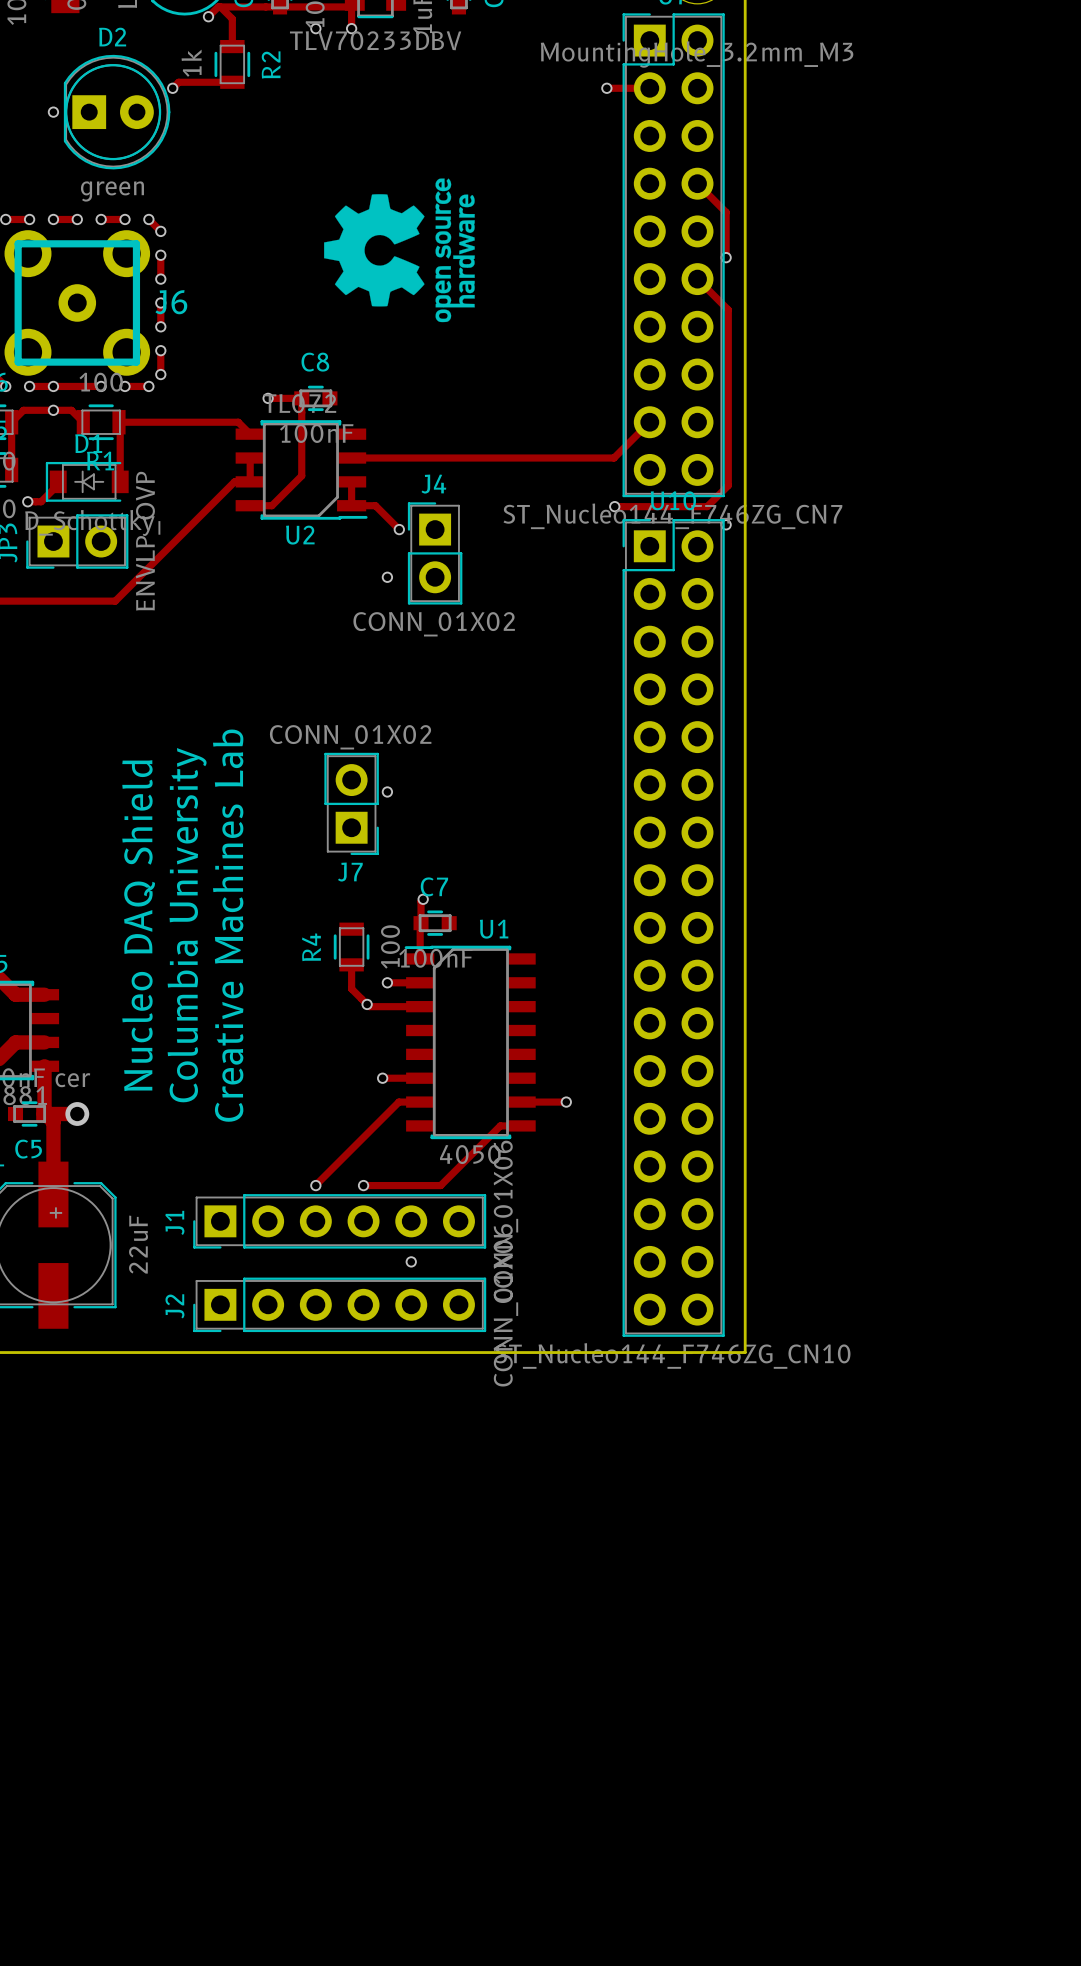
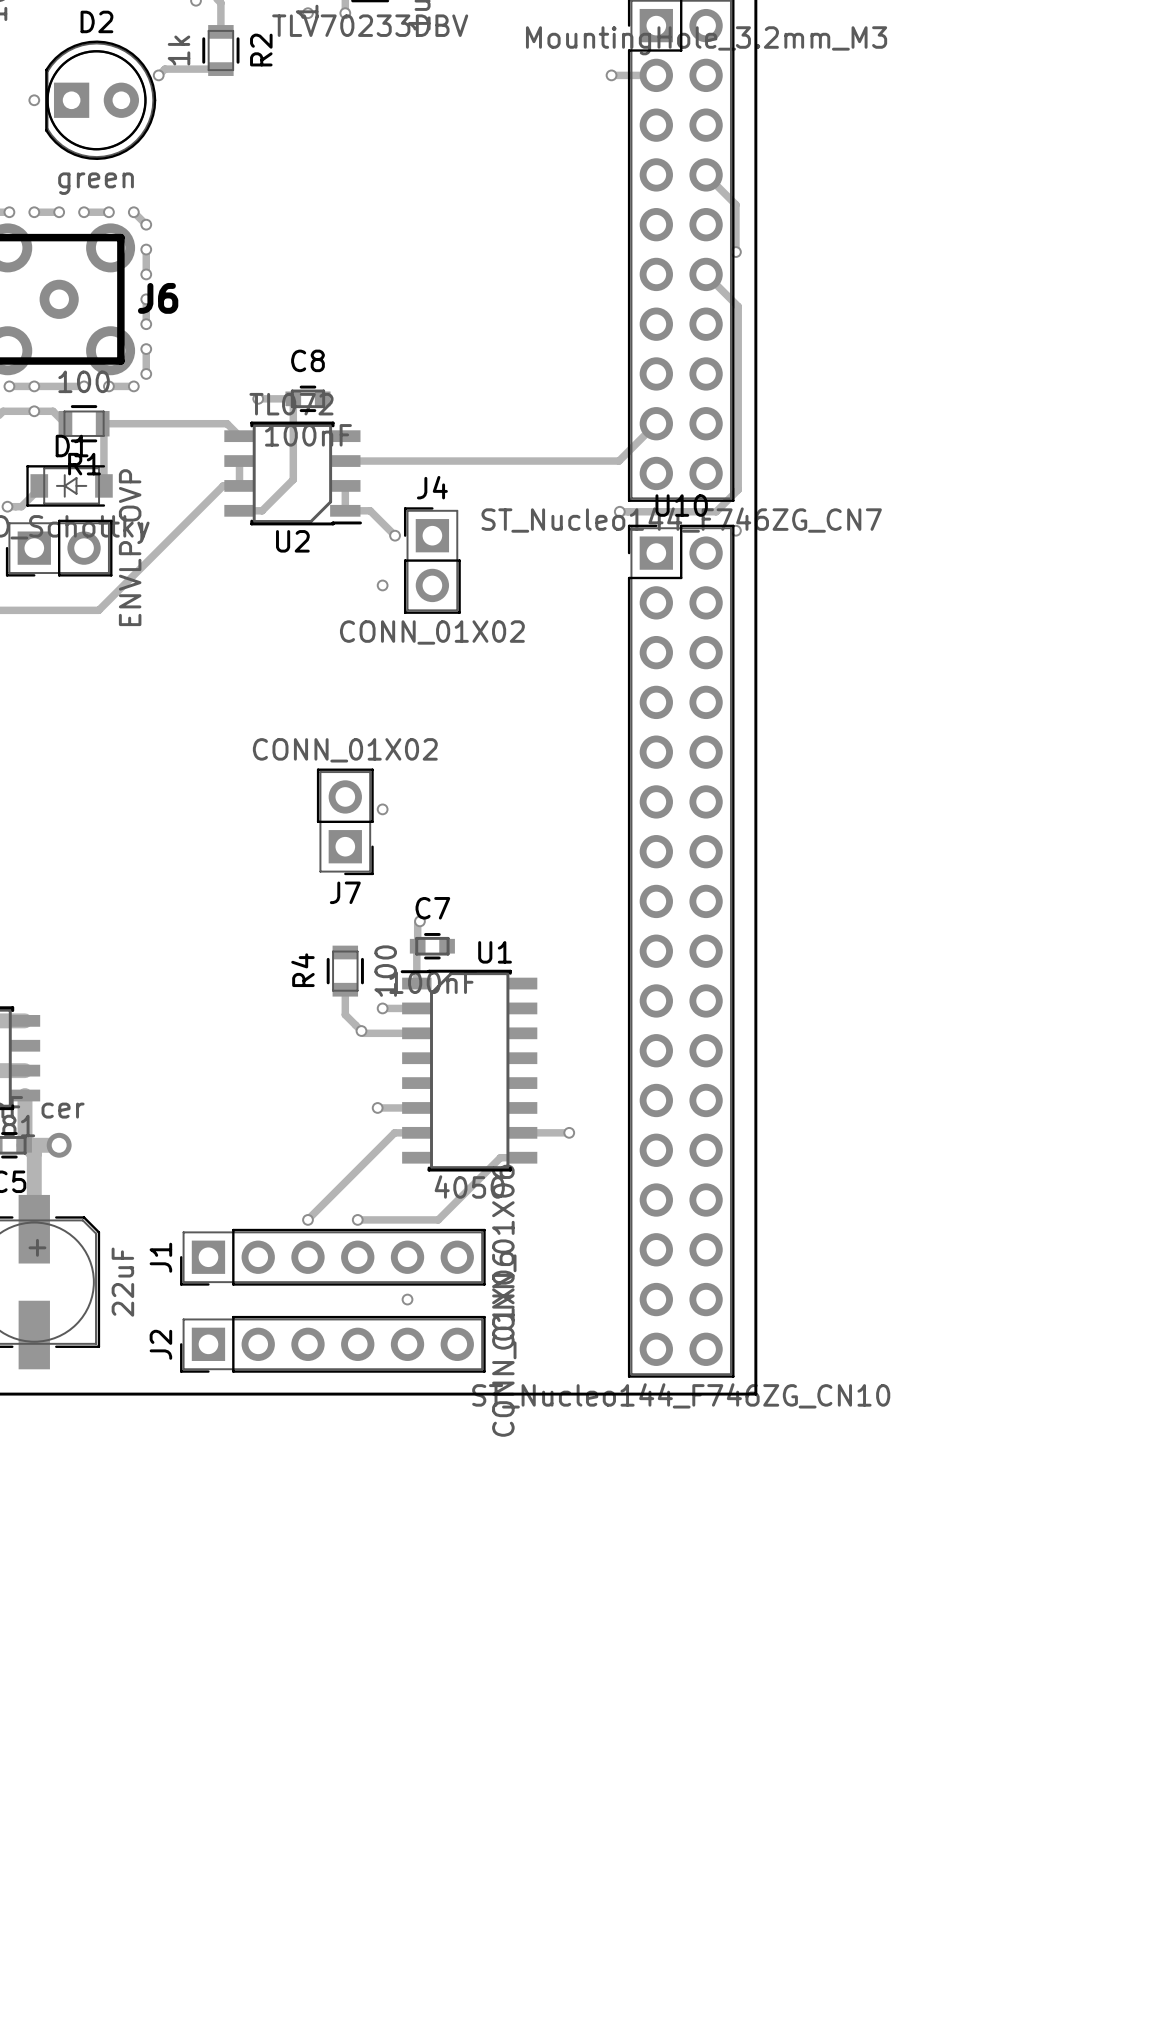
drawing: [324, 178, 475, 323] -> none
text: Nucleo DAQ Shield (138, 925) -> none
text: Columbia University (187, 925) -> none
text: Creative Machines Lab (228, 925) -> none

